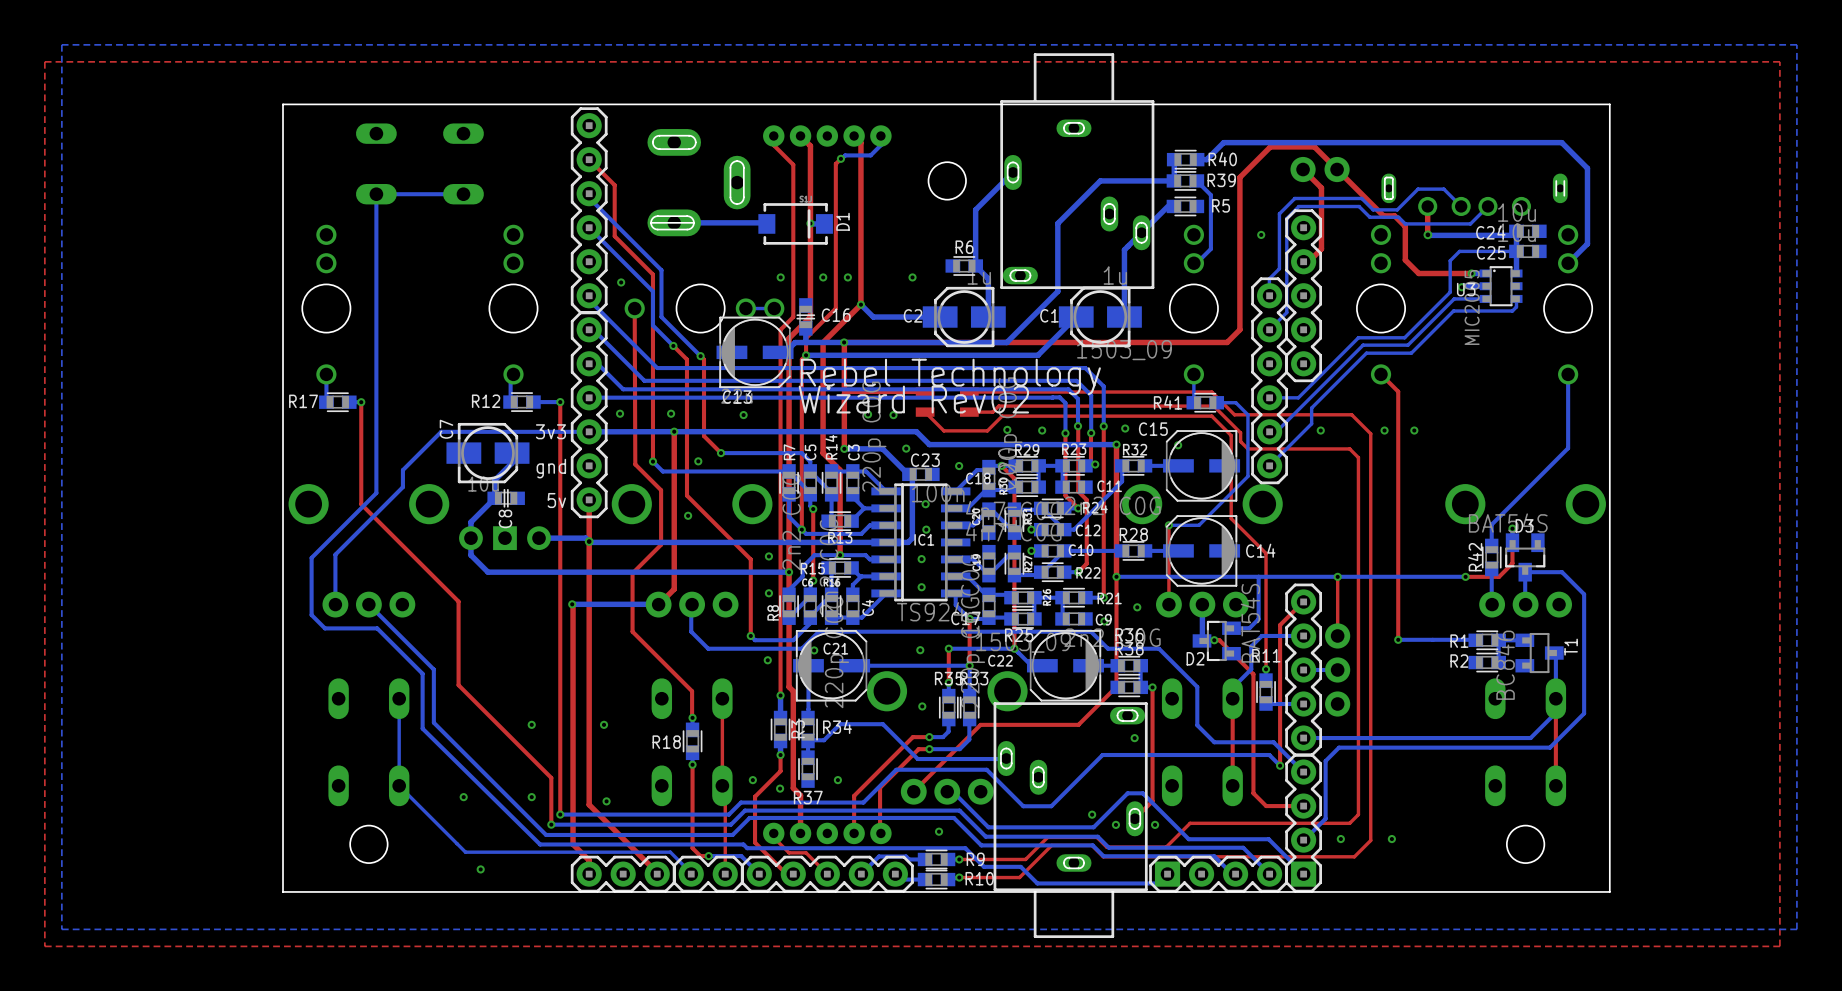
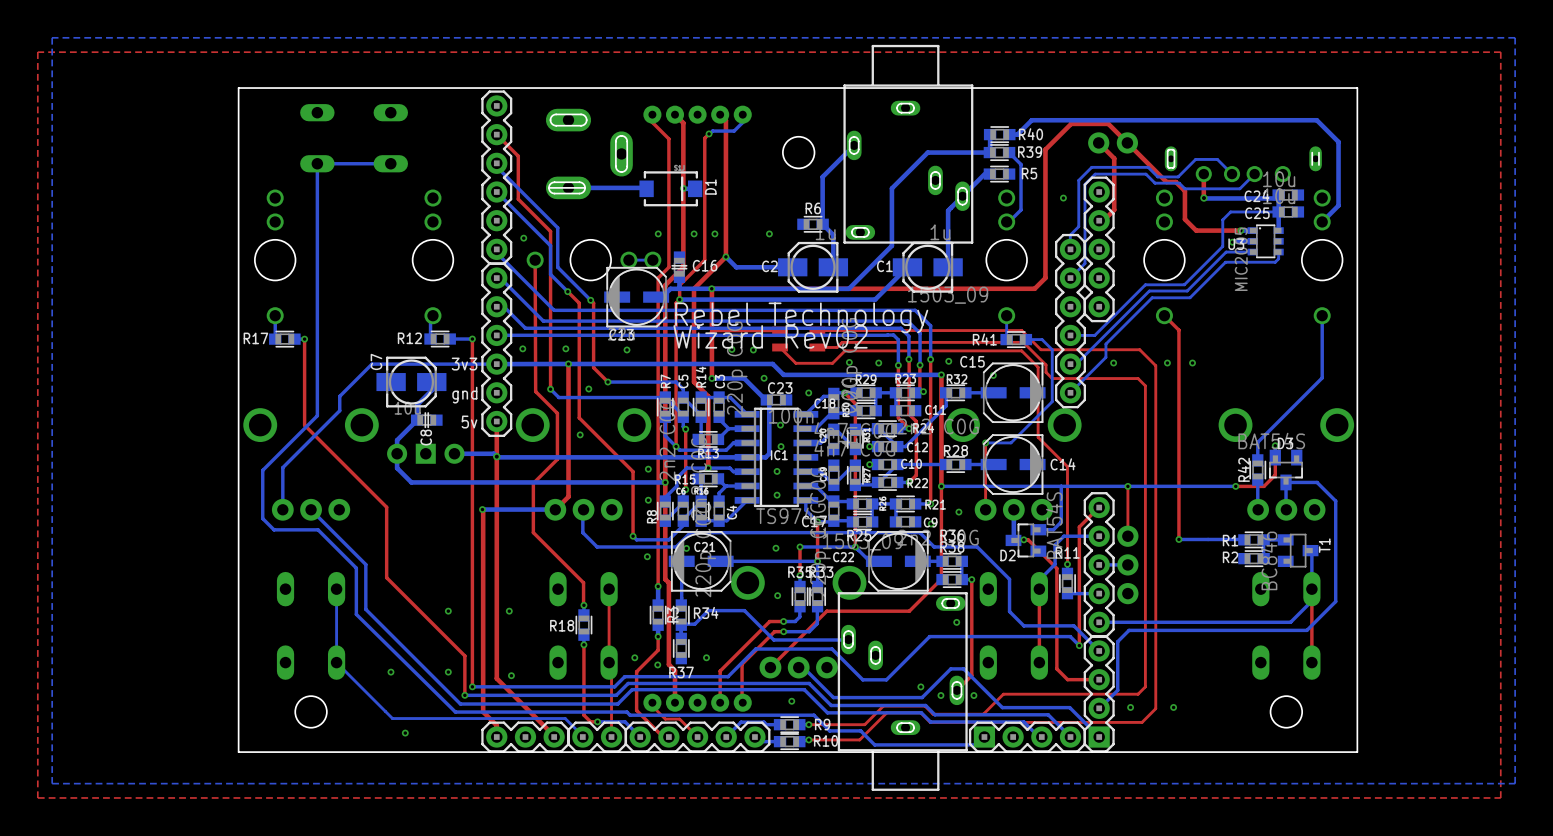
IC1 value: TS924 (930, 611) -> TS974 (784, 515)

